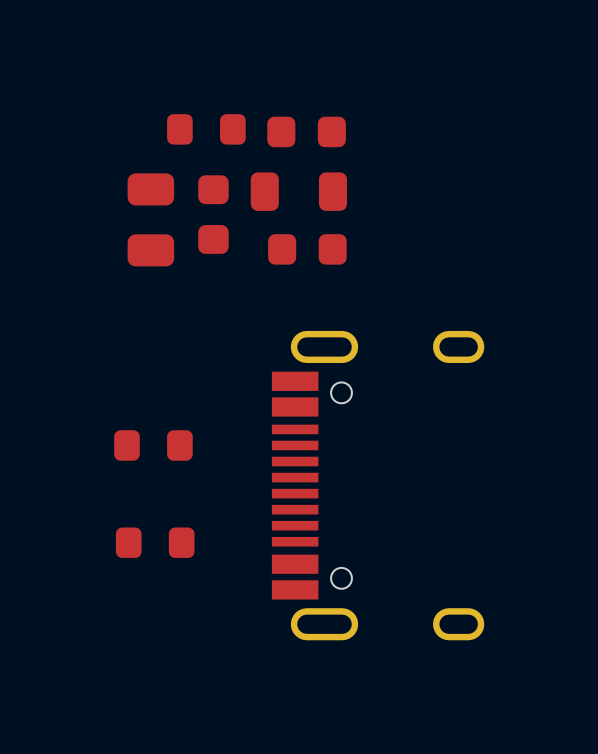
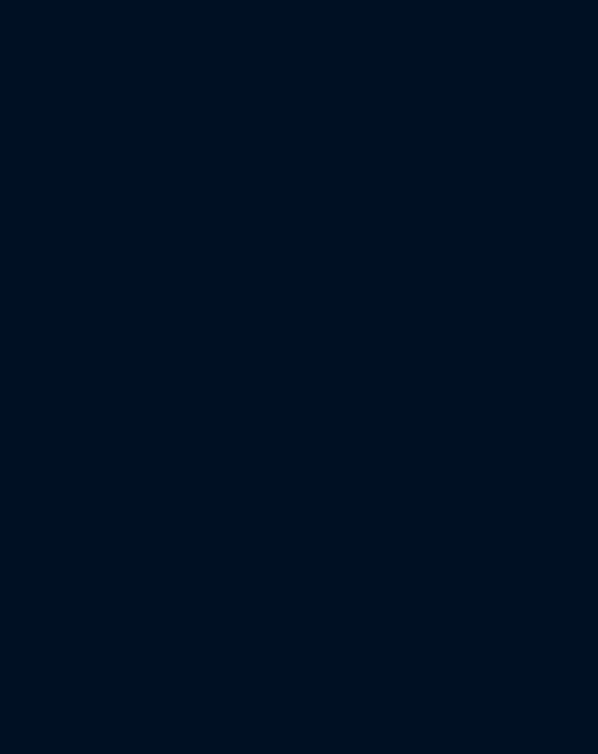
part: (206, 129) -> none
part: (306, 131) -> none
part: (298, 191) -> none
part: (213, 214) -> none
part: (150, 219) -> none
part: (307, 249) -> none
part: (153, 445) -> none
part: (378, 485) -> none
part: (155, 542) -> none

